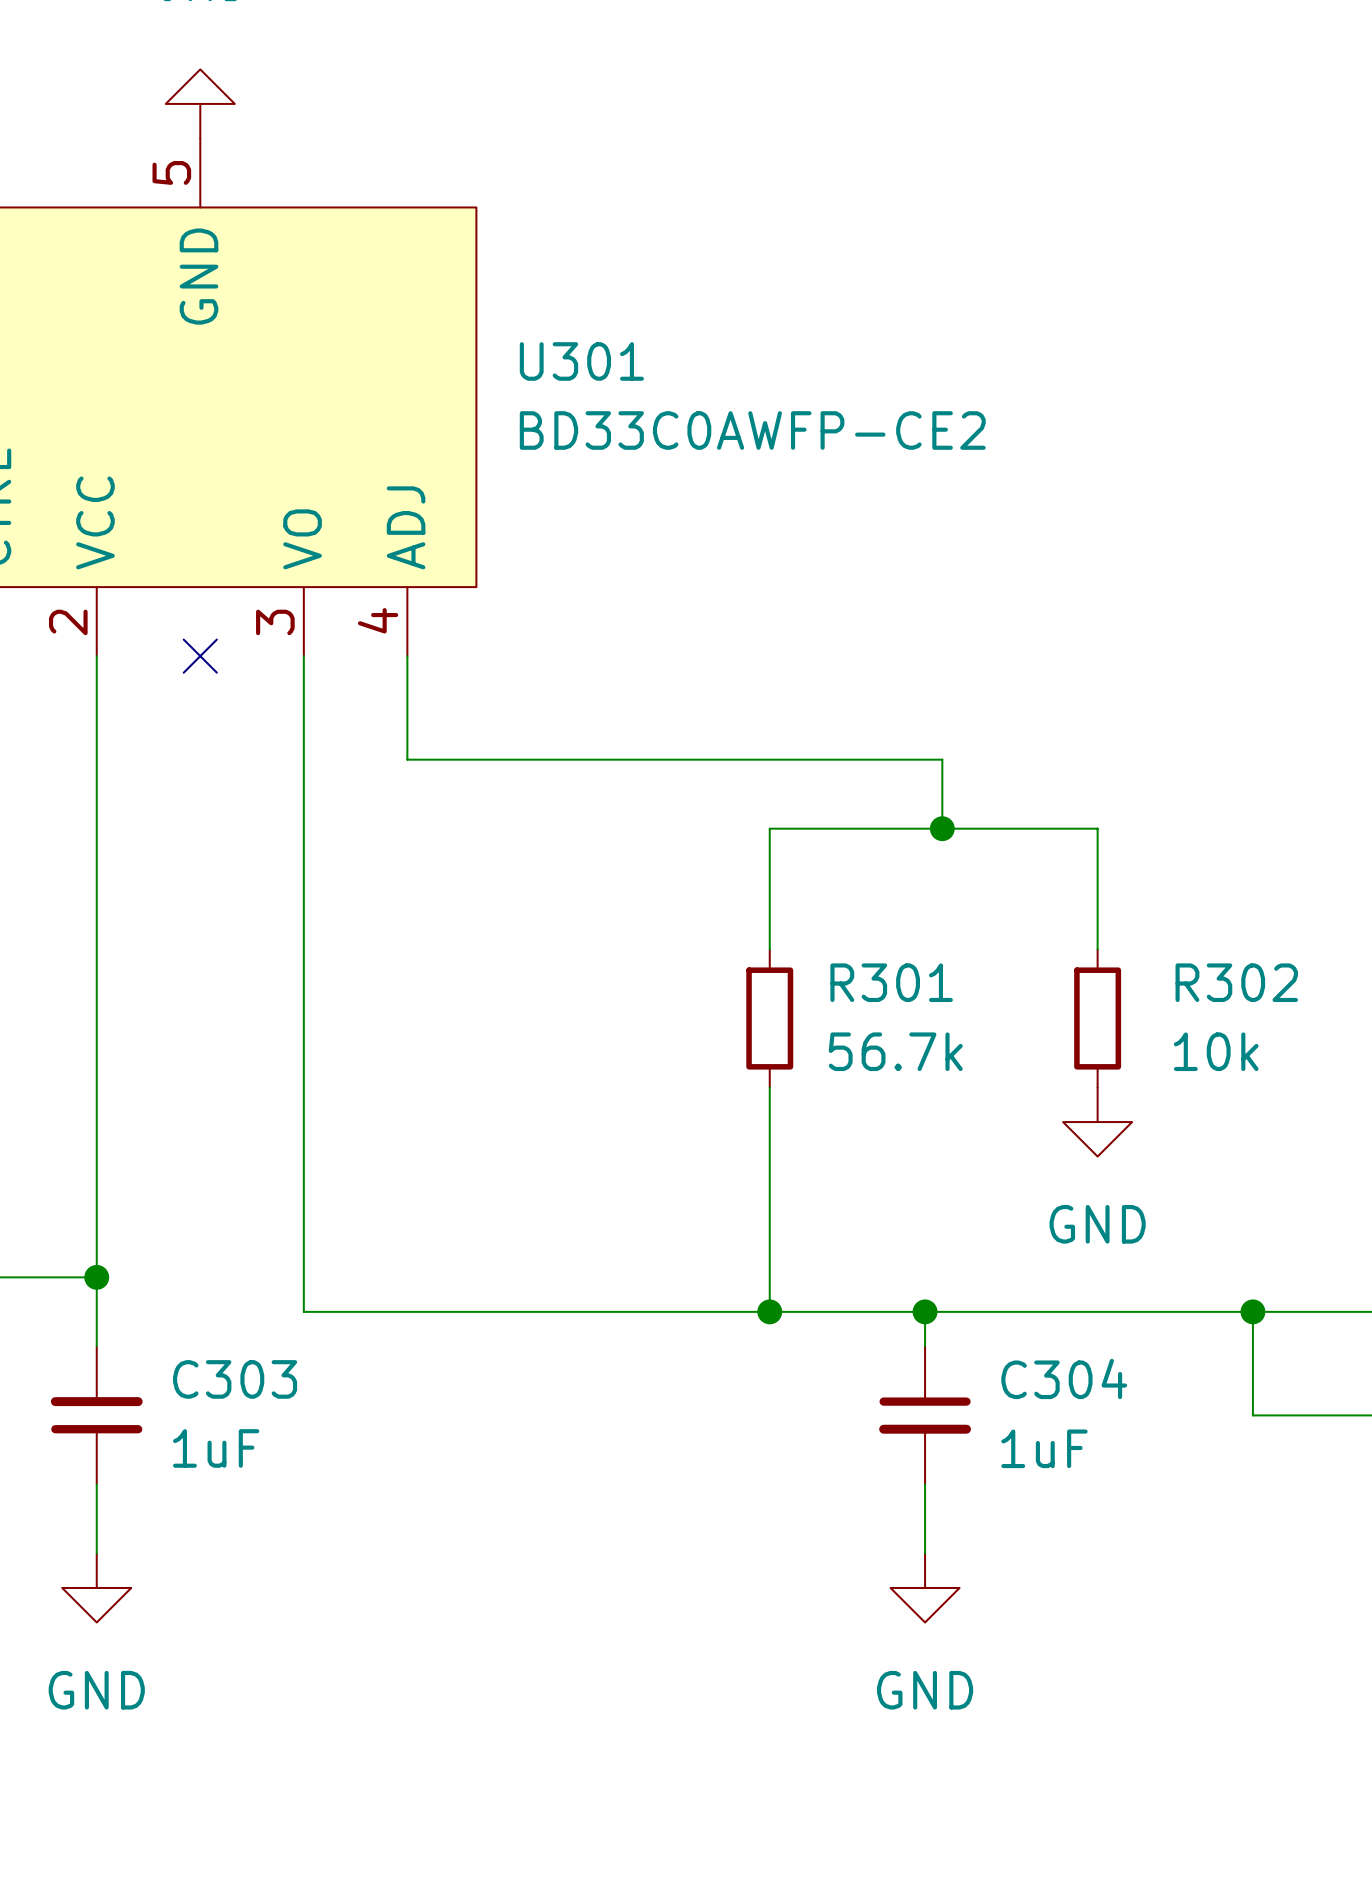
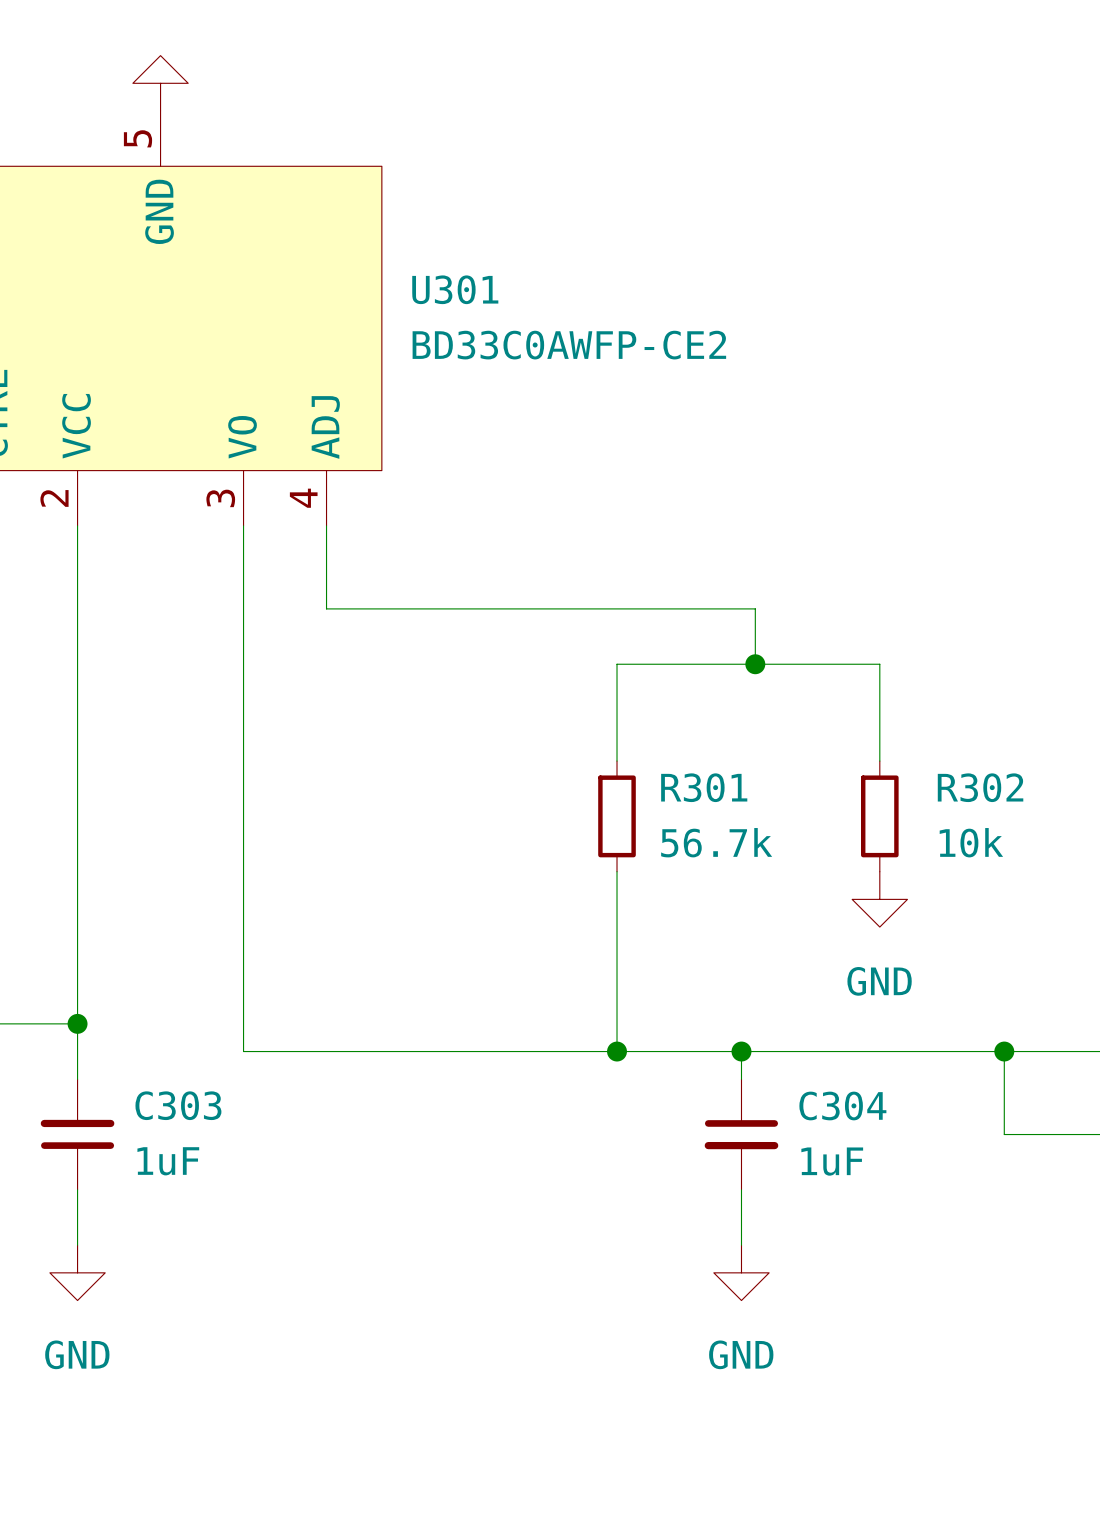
no-connect mark: (200, 656) -> none

